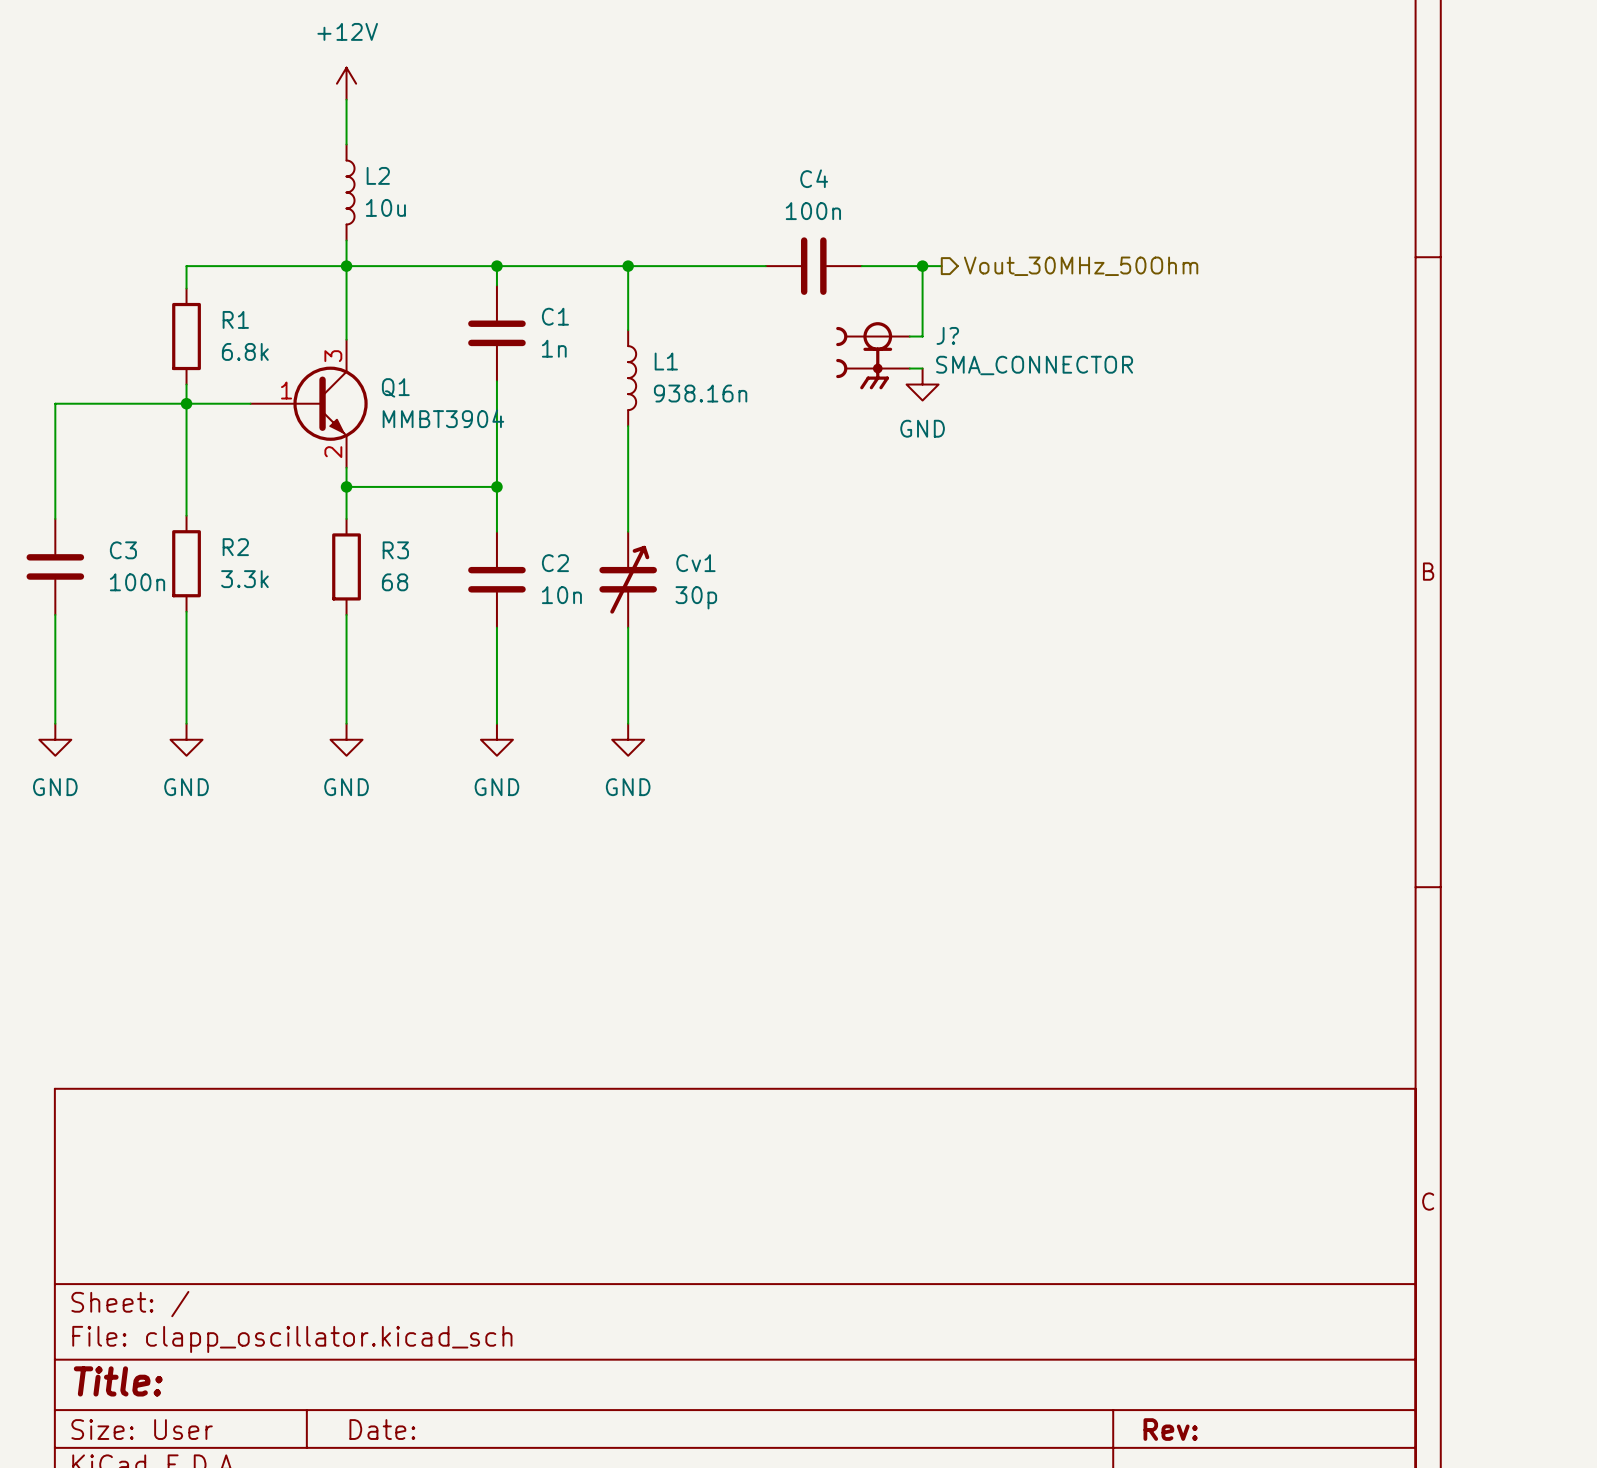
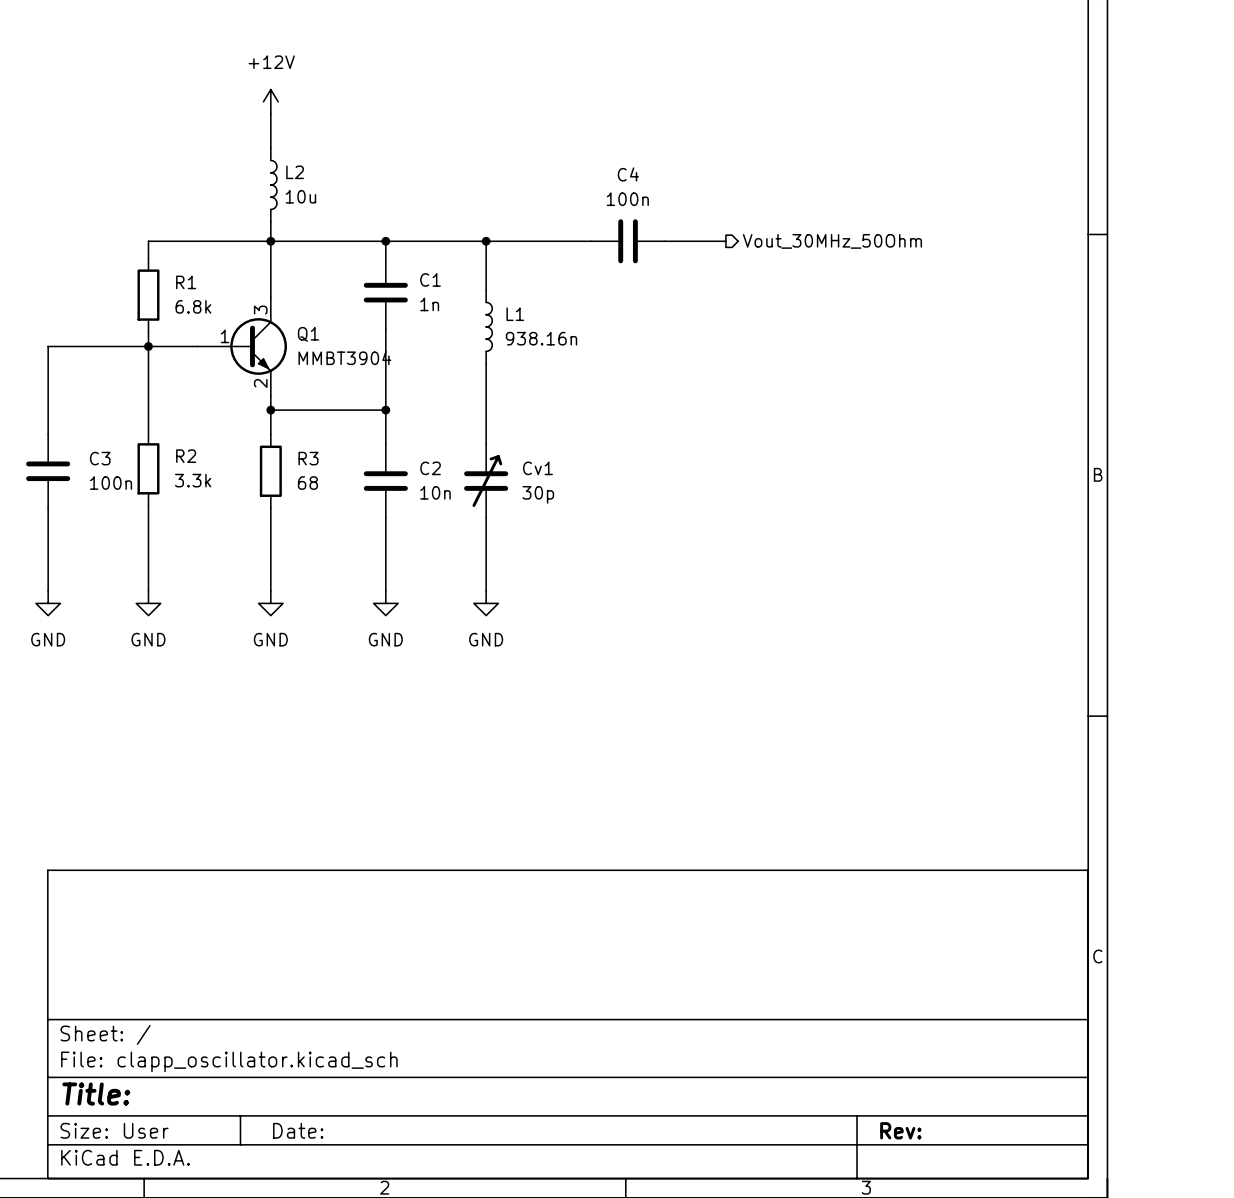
wire: (922, 266) (922, 336) (909, 336) -> none
junction: (922, 266) -> none
J?: SMA_CONNECTOR (872, 355) -> none
wire: (909, 368) (922, 368) -> none
power symbol: GND (922, 384) -> none

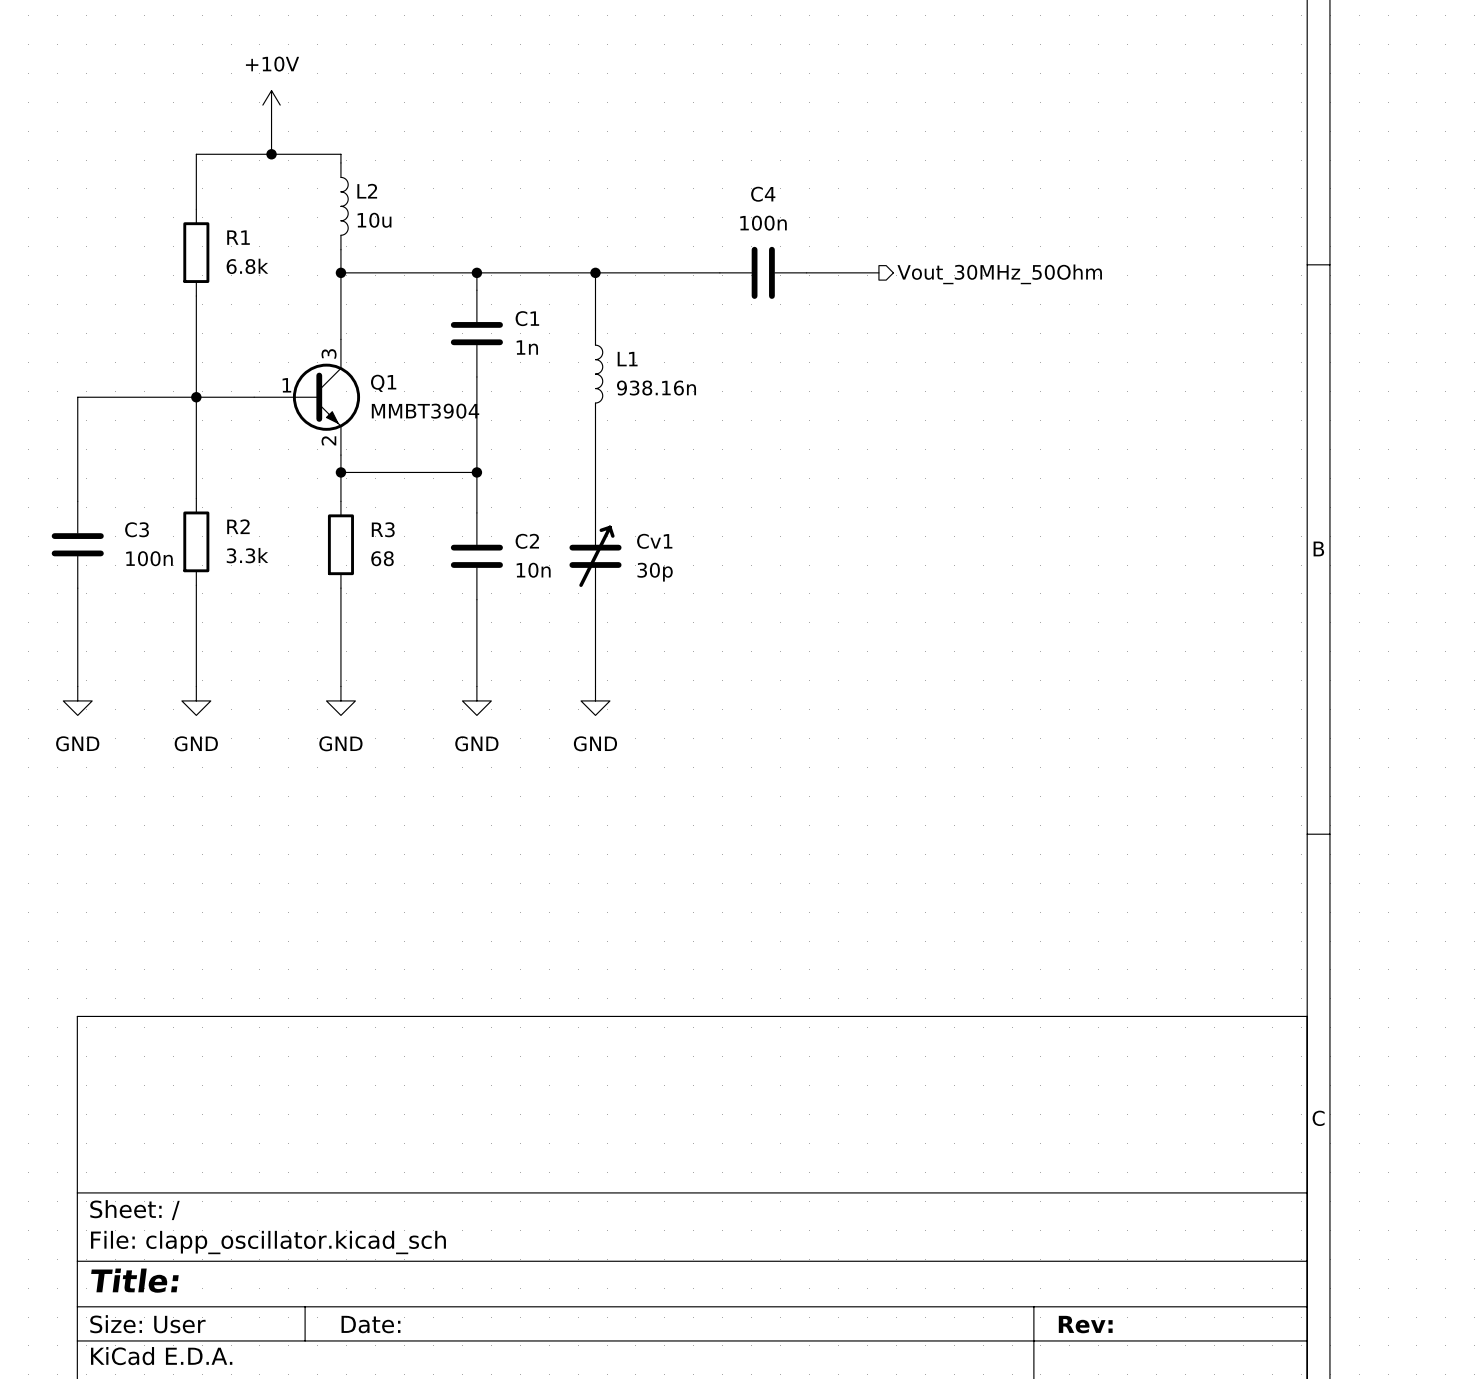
power symbol: none -> +10V (271, 105)
power symbol: +12V (270, 101) -> none
wire: none -> (271, 119) (271, 154)
wire: (270, 114) (270, 140) -> (196, 209) (196, 154) (340, 154)
junction: none -> (271, 154)
wire: (270, 241) (148, 241) (148, 258) -> none
wire: none -> (196, 296) (196, 379)
R1 position: (148, 295) -> (196, 252)

